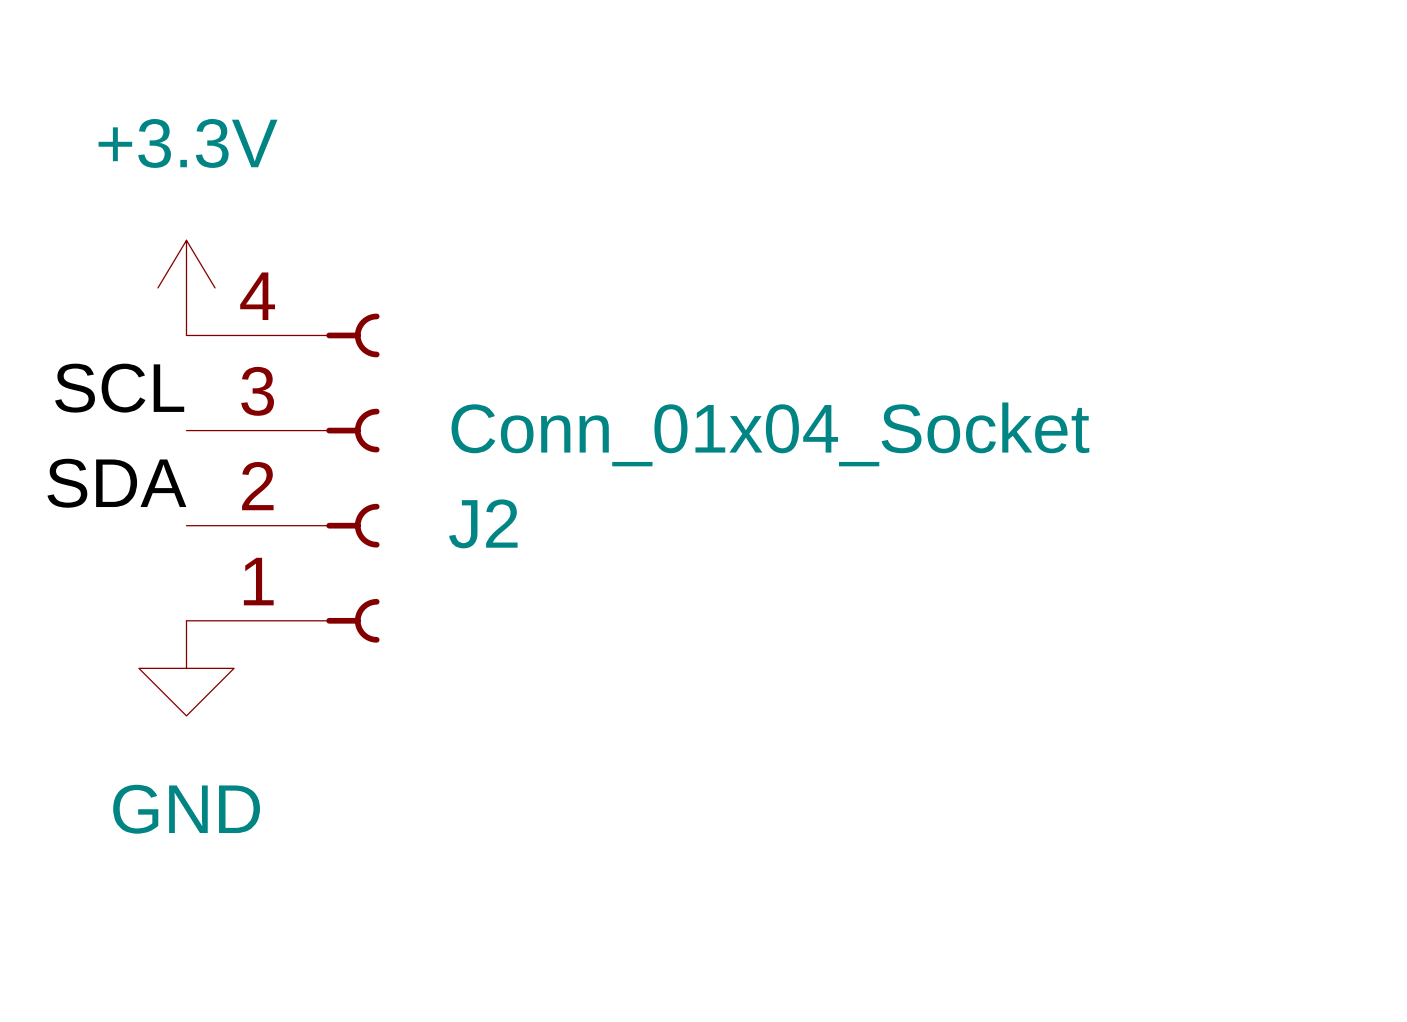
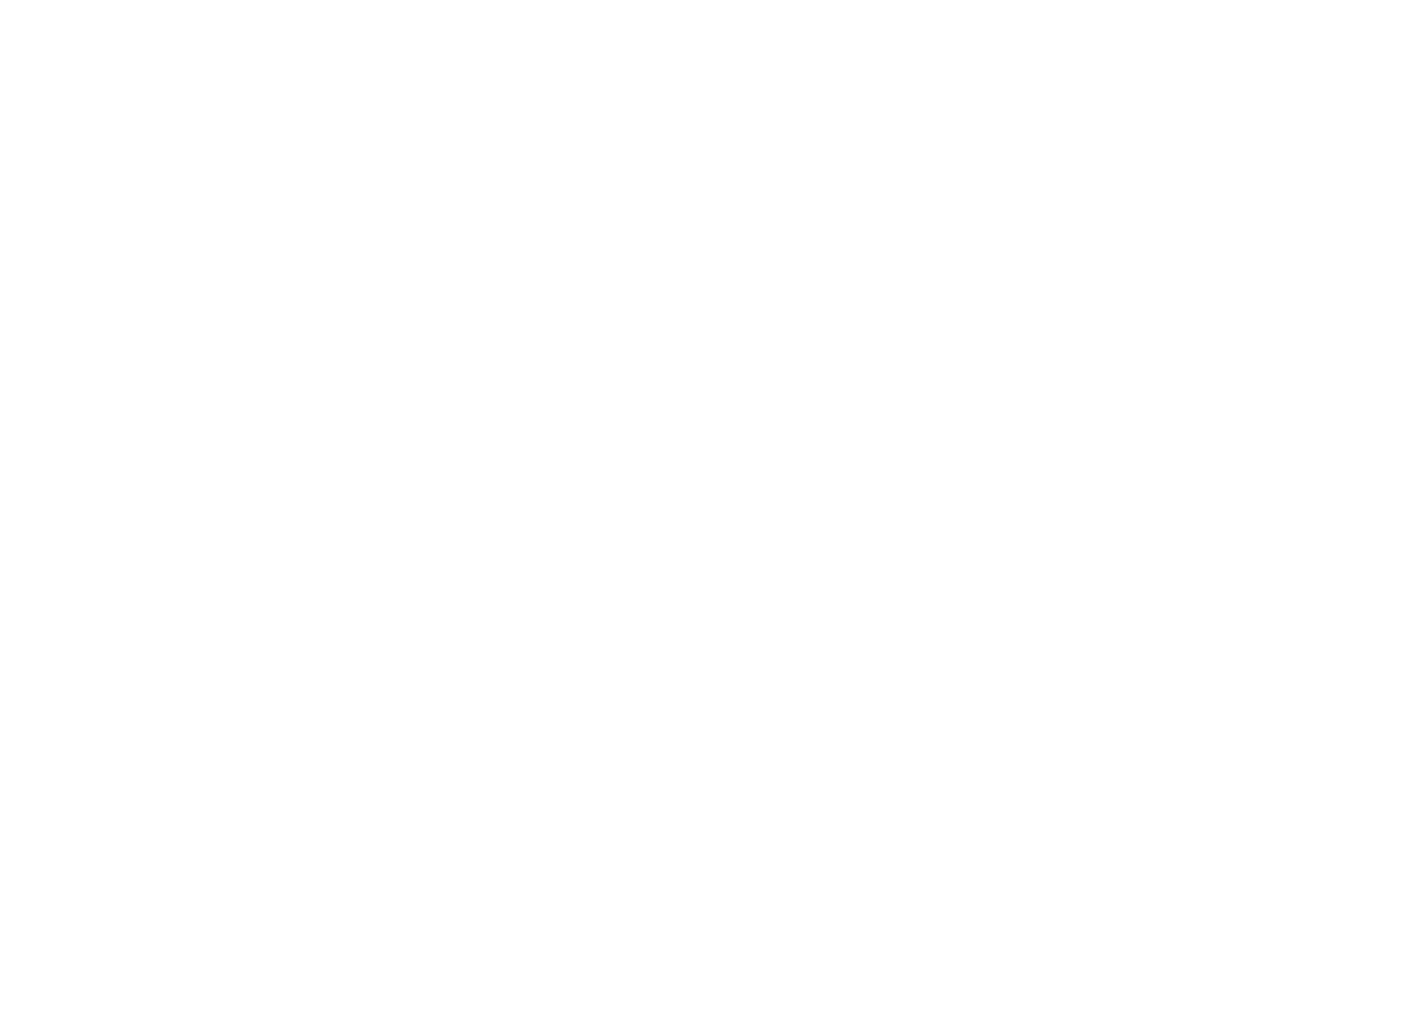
power symbol: +3.3V (186, 287) -> none
label: SCL (119, 388) -> none
J2: Conn_01x04_Socket (283, 478) -> none
label: SDA (116, 483) -> none
power symbol: GND (186, 668) -> none

